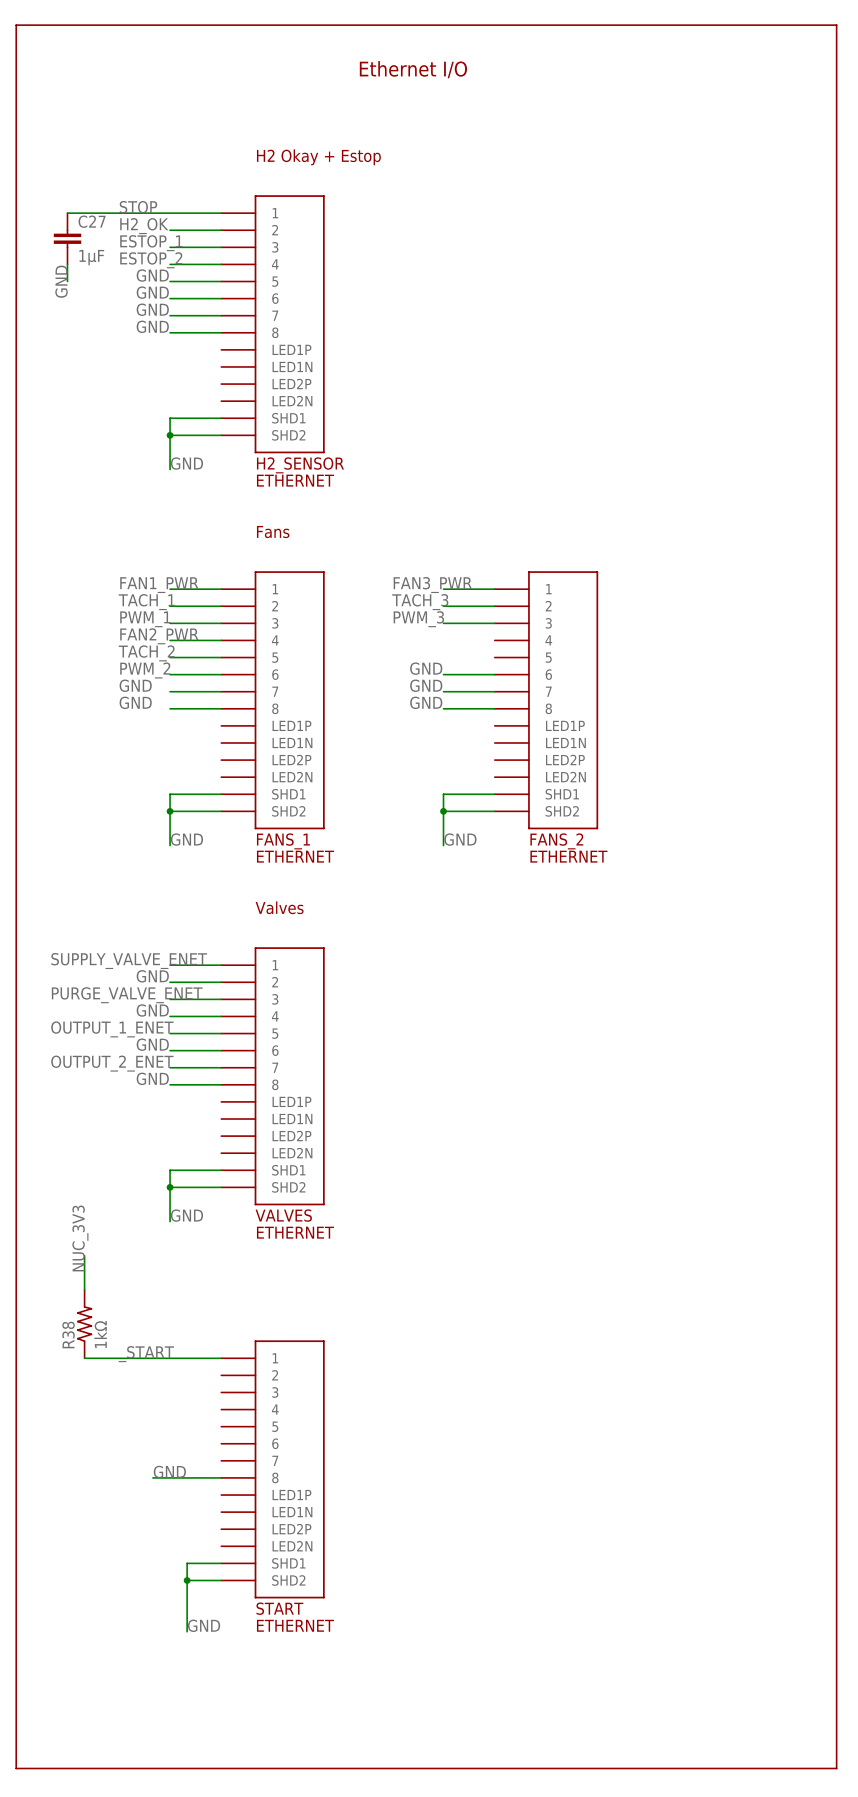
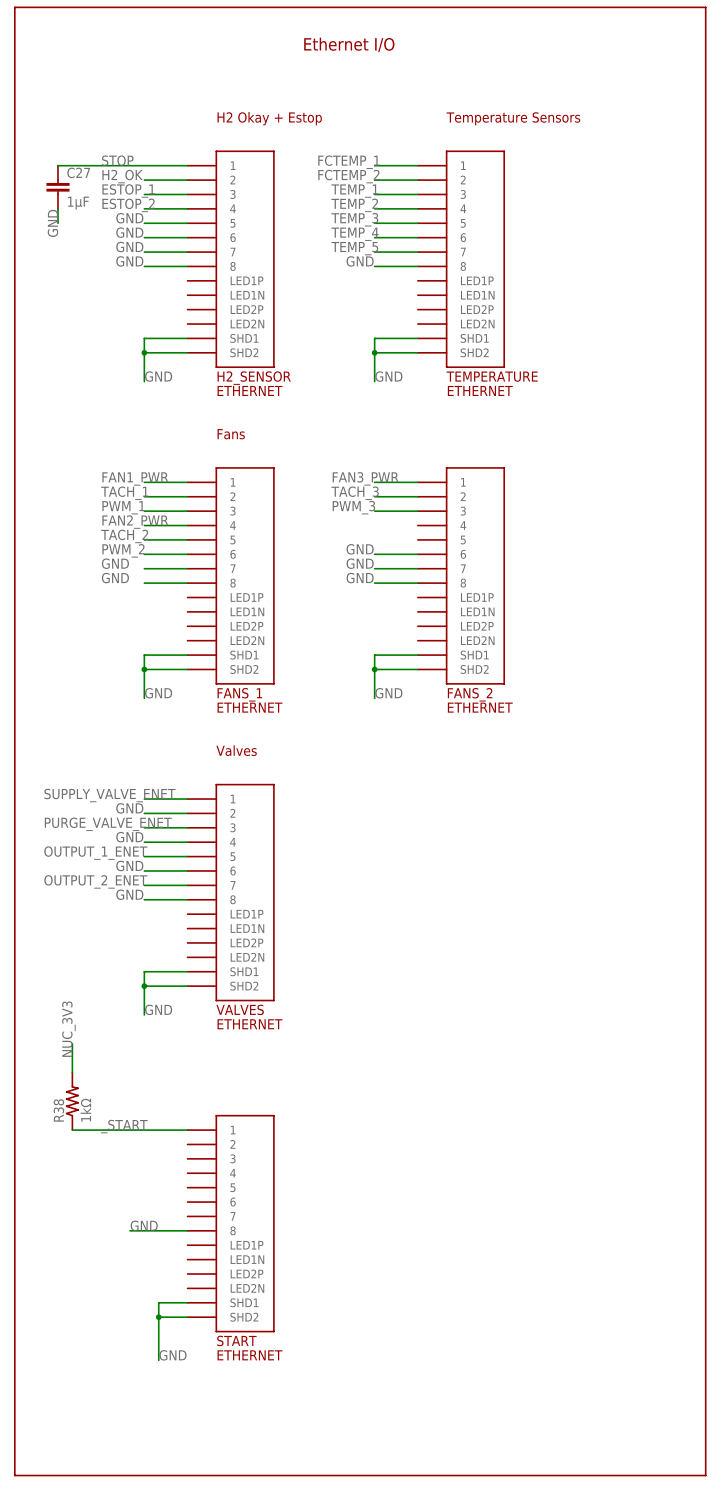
text: none -> Temperature Sensors (513, 118)
label: none -> FCTEMP_1 (348, 162)
wire: none -> (374, 165) (417, 165)
label: none -> FCTEMP_2 (348, 176)
wire: none -> (374, 180) (417, 180)
label: none -> TEMP_1 (354, 191)
wire: none -> (374, 194) (417, 194)
label: none -> TEMP_2 (354, 205)
wire: none -> (374, 208) (417, 208)
label: none -> TEMP_3 (354, 219)
wire: none -> (374, 223) (417, 223)
label: none -> TEMP_4 (355, 234)
wire: none -> (374, 237) (417, 237)
label: none -> TEMP_5 (354, 248)
wire: none -> (374, 252) (417, 252)
TEMPERATURE: none -> ETHERNET (461, 259)
label: none -> GND (360, 261)
wire: none -> (374, 266) (417, 266)
wire: none -> (417, 338) (374, 338) (374, 381)
wire: none -> (374, 352) (417, 352)
junction: none -> (374, 352)
label: none -> GND (388, 376)

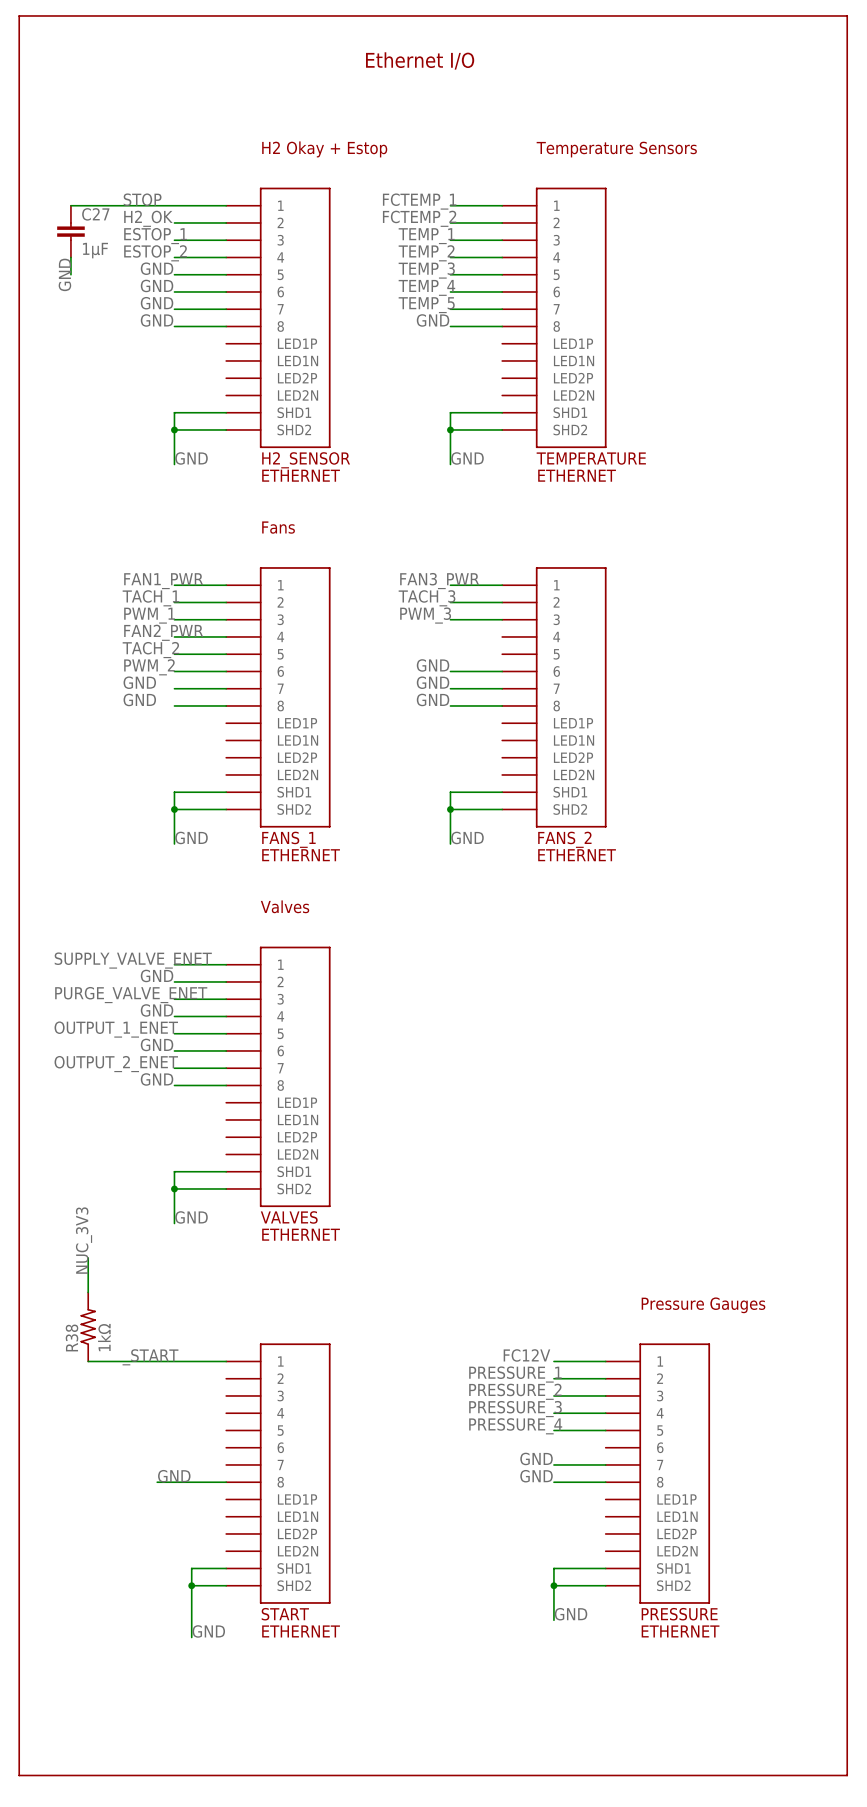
text: none -> Pressure Gauges (703, 1305)
label: none -> FC12V (526, 1355)
wire: none -> (553, 1361) (605, 1361)
label: none -> PRESSURE_1 (515, 1374)
wire: none -> (553, 1378) (605, 1378)
label: none -> PRESSURE_2 (515, 1391)
wire: none -> (553, 1395) (605, 1395)
label: none -> PRESSURE_3 (515, 1409)
wire: none -> (553, 1413) (605, 1413)
label: none -> PRESSURE_4 (515, 1426)
wire: none -> (553, 1430) (605, 1430)
label: none -> GND (536, 1458)
wire: none -> (553, 1464) (605, 1464)
PRESSURE: none -> ETHERNET (657, 1473)
label: none -> GND (536, 1476)
wire: none -> (553, 1482) (605, 1482)
wire: none -> (605, 1568) (553, 1568) (553, 1620)
wire: none -> (553, 1585) (605, 1585)
junction: none -> (553, 1585)
label: none -> GND (571, 1614)

